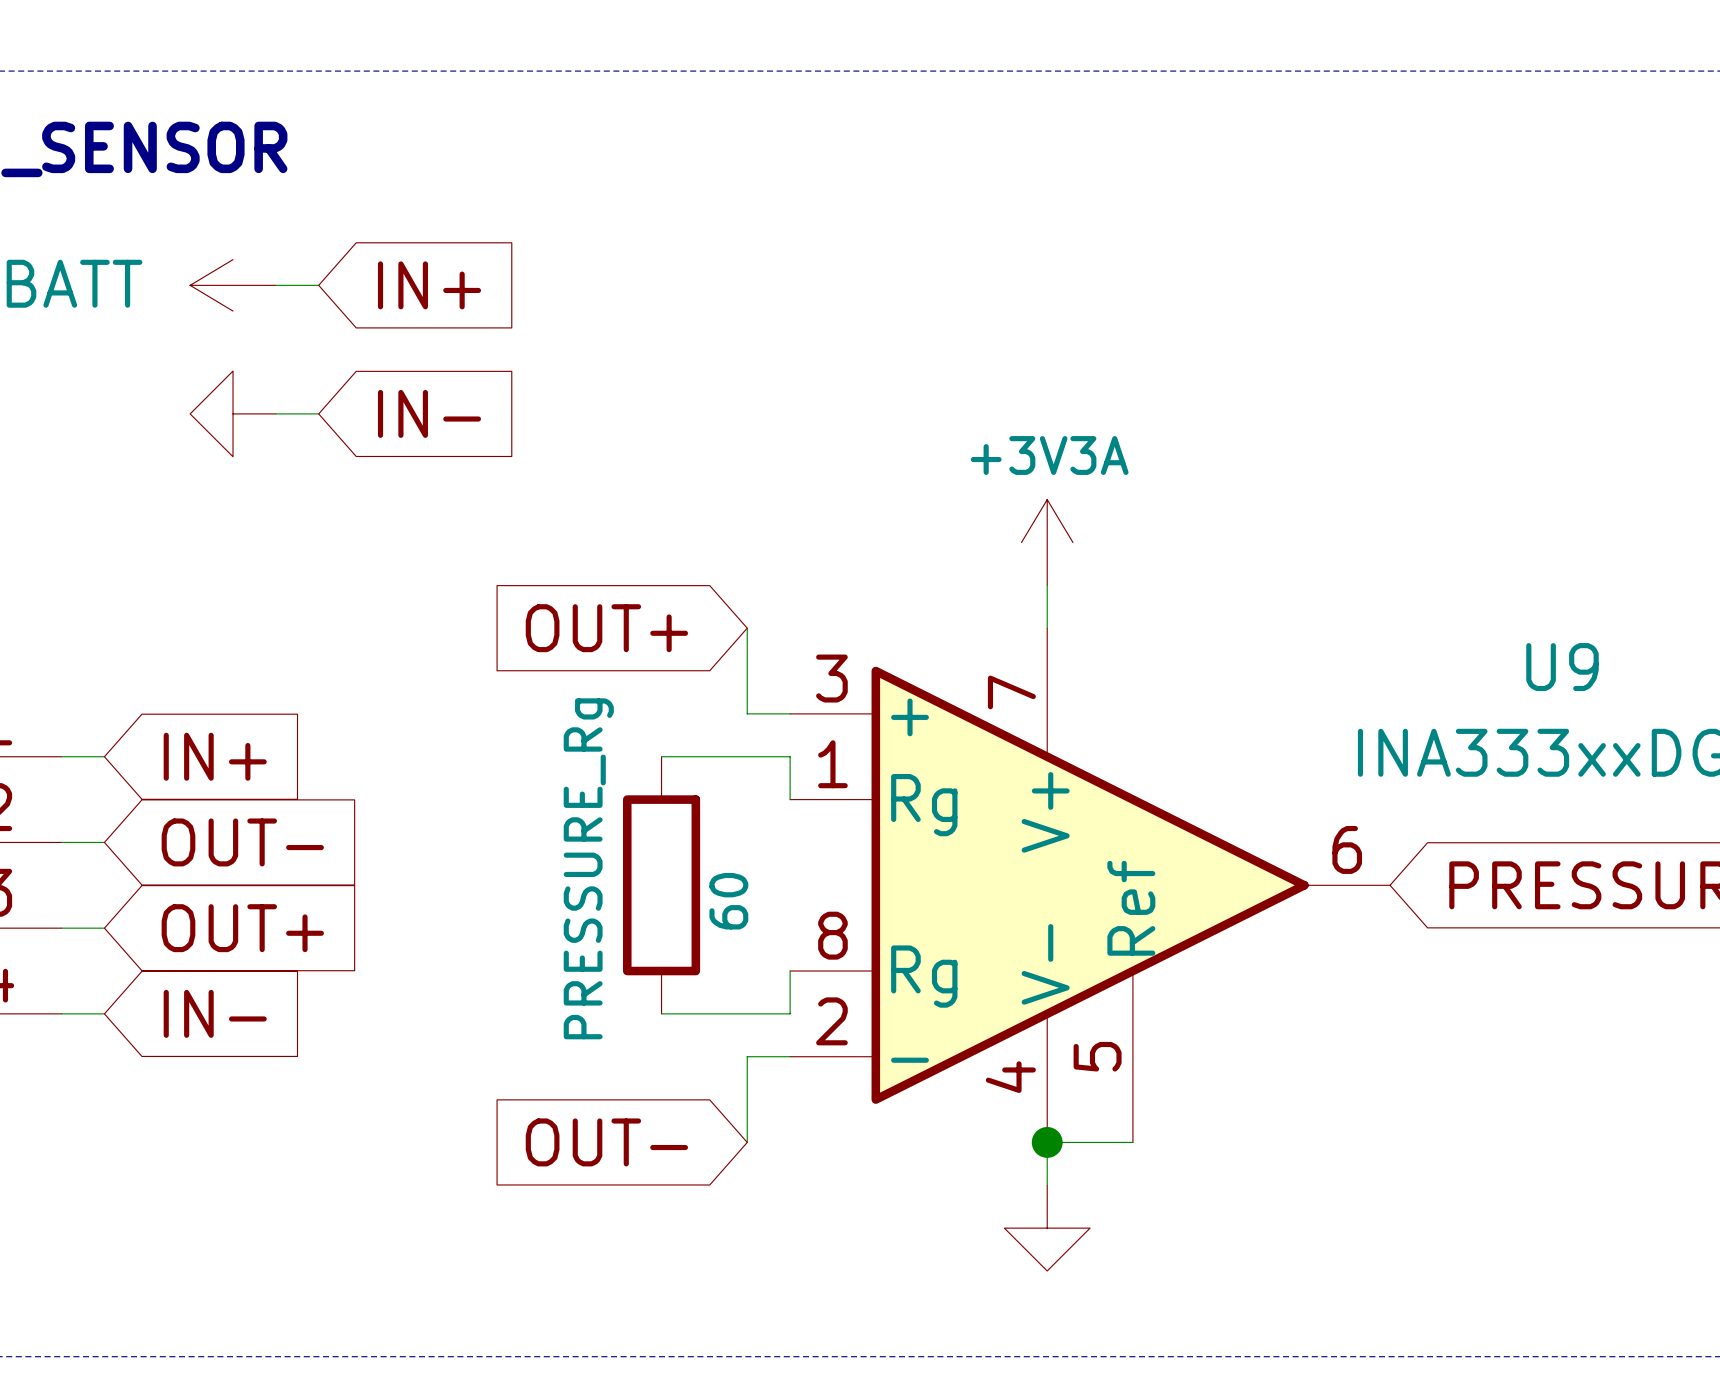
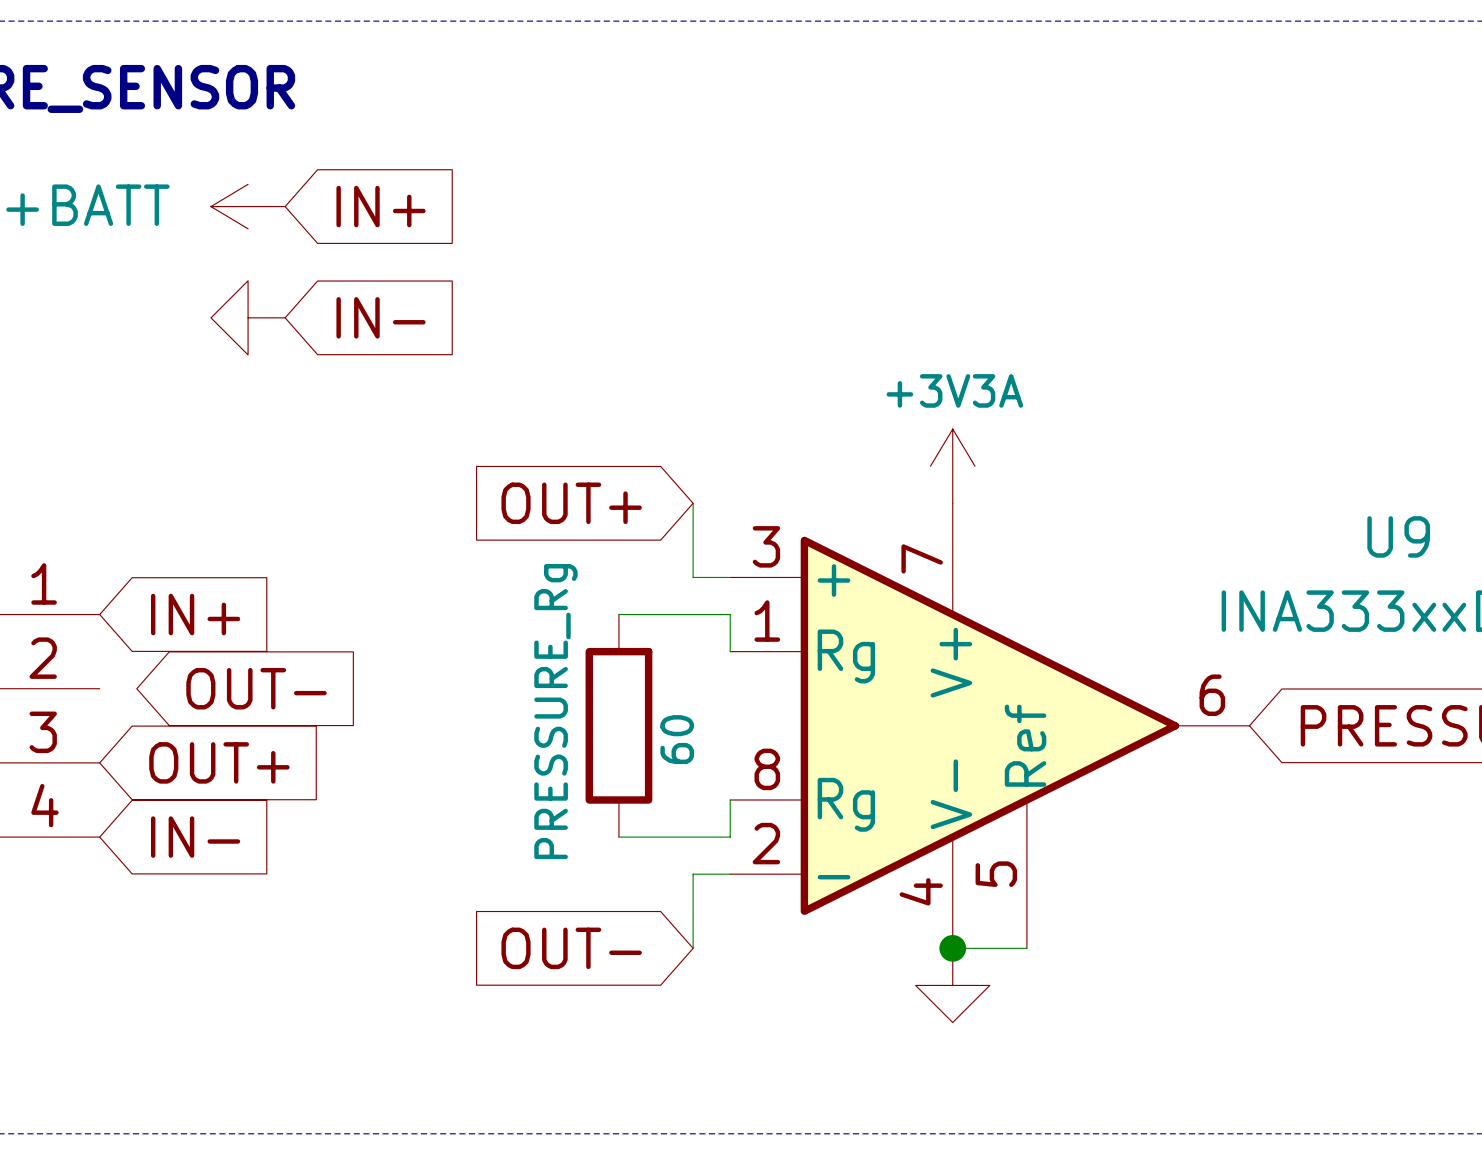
wire: (275, 285) (318, 285) -> none
global label position: IN+ (429, 285) -> IN+ (381, 206)
wire: (275, 413) (318, 413) -> none
global label position: IN- (429, 413) -> IN- (381, 317)
power symbol position: +3V3A (1047, 542) -> +3V3A (952, 466)
wire: (61, 756) (104, 756) -> none
global label position: IN+ (215, 756) -> IN+ (195, 614)
wire: (61, 842) (104, 842) -> none
wire: (61, 928) (104, 928) -> none
global label position: OUT+ (242, 928) -> OUT+ (219, 762)
wire: (61, 1013) (104, 1013) -> none
global label position: IN- (215, 1013) -> IN- (195, 837)
power symbol position: (1047, 1228) -> (952, 985)

